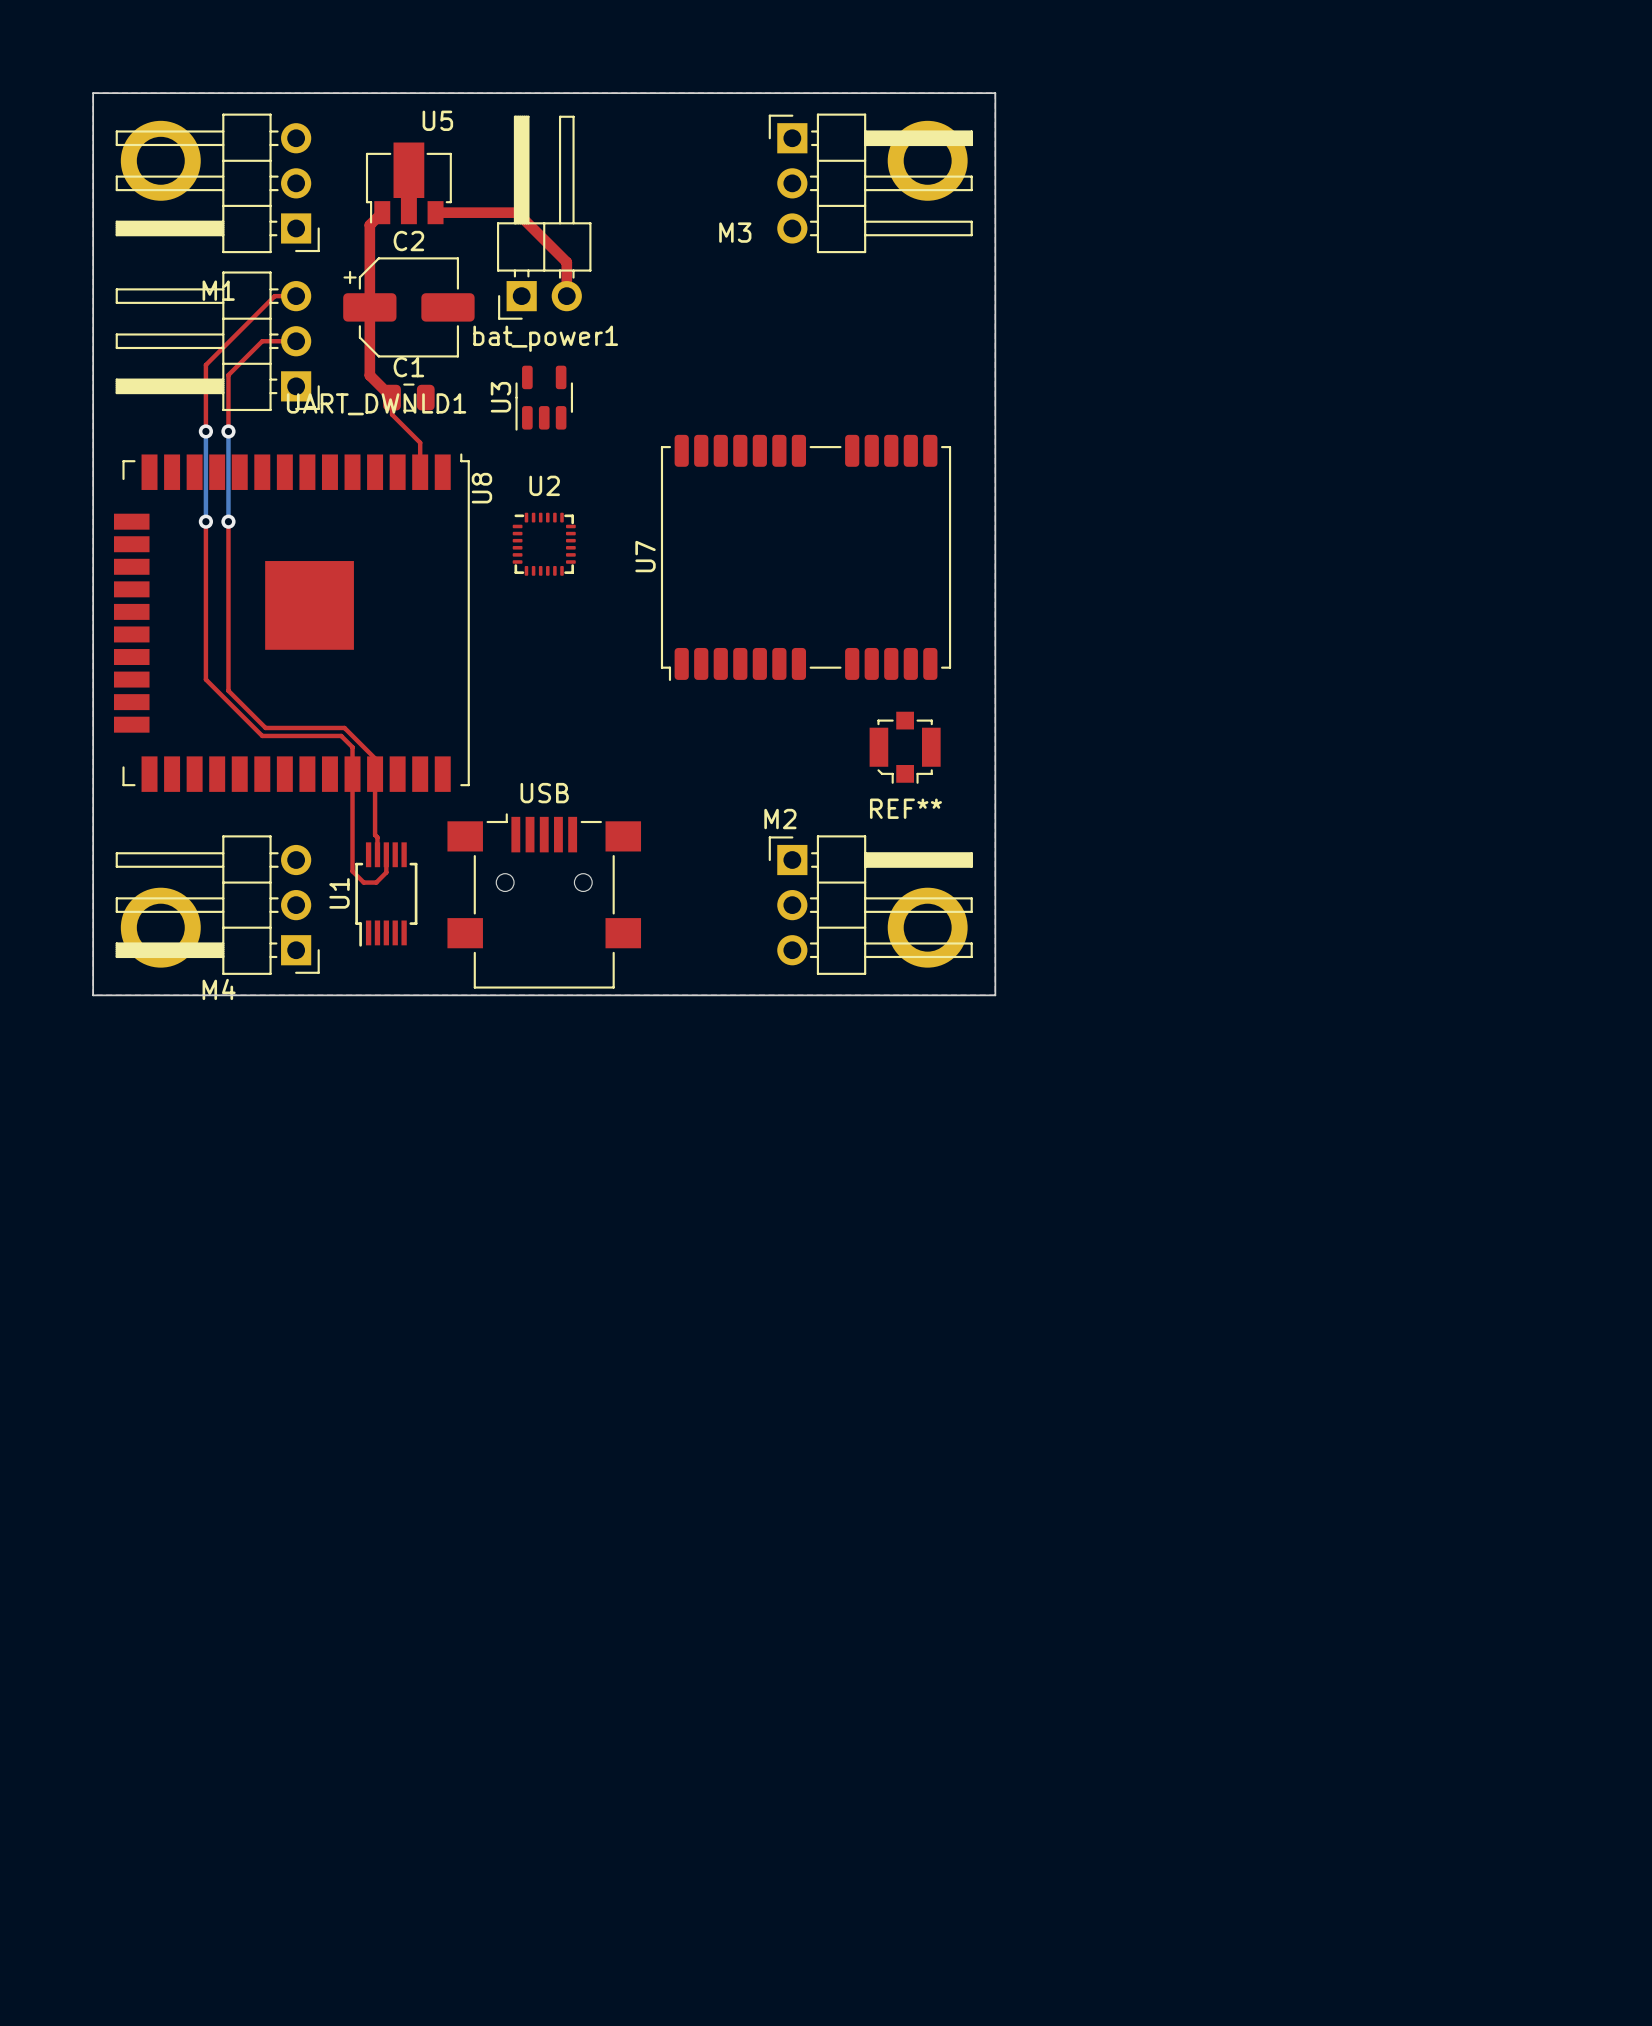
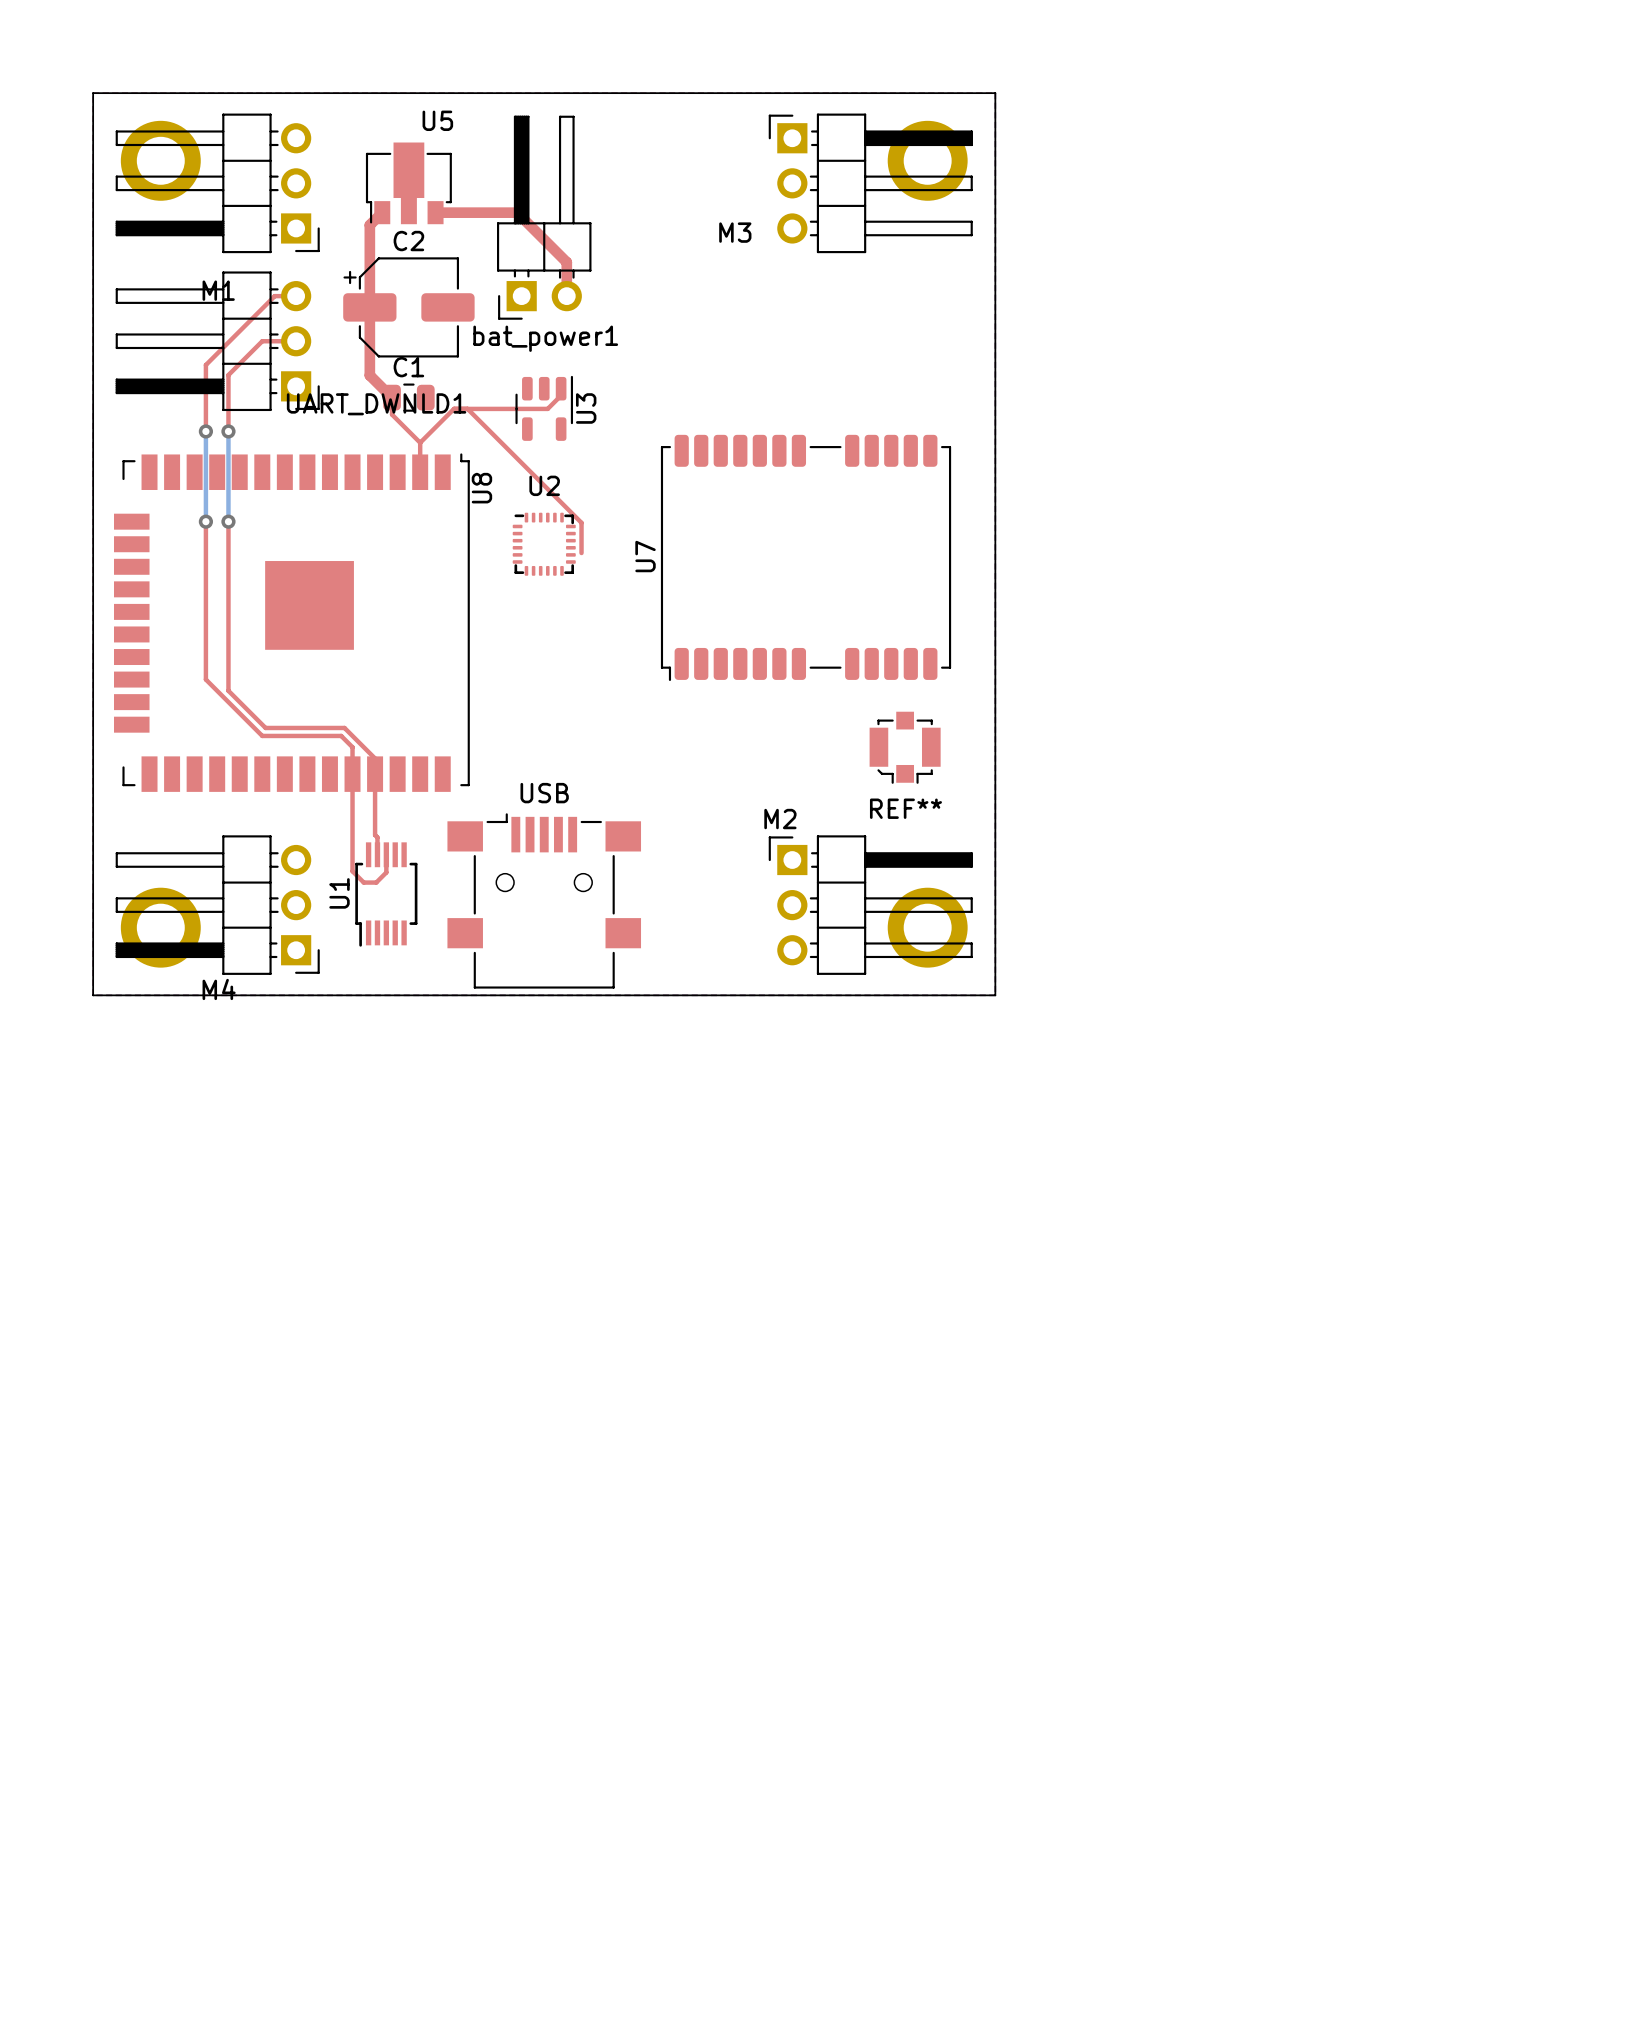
top track: none -> (561, 388) (561, 395) (547, 408) (454, 408) (420, 442)
U3 rotation: 0° (544, 398) -> 180° (544, 408)
top track: none -> (467, 408) (581, 522) (581, 553)

